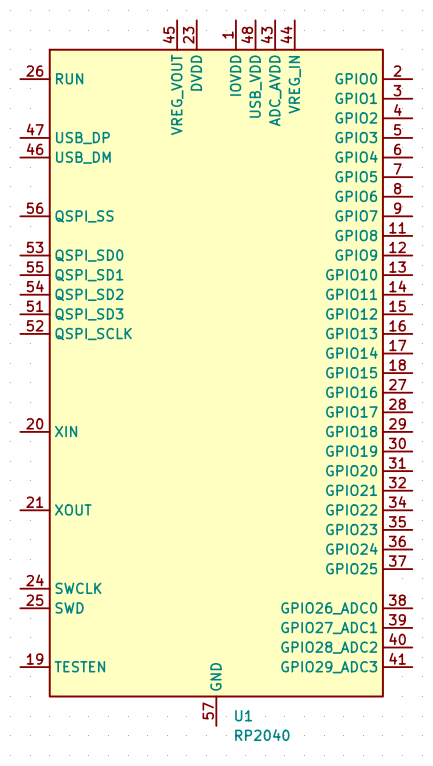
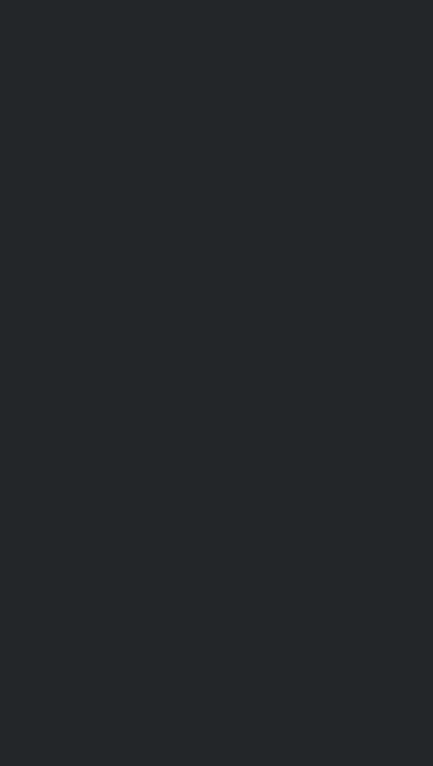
U1: RP2040 (216, 373) -> none

